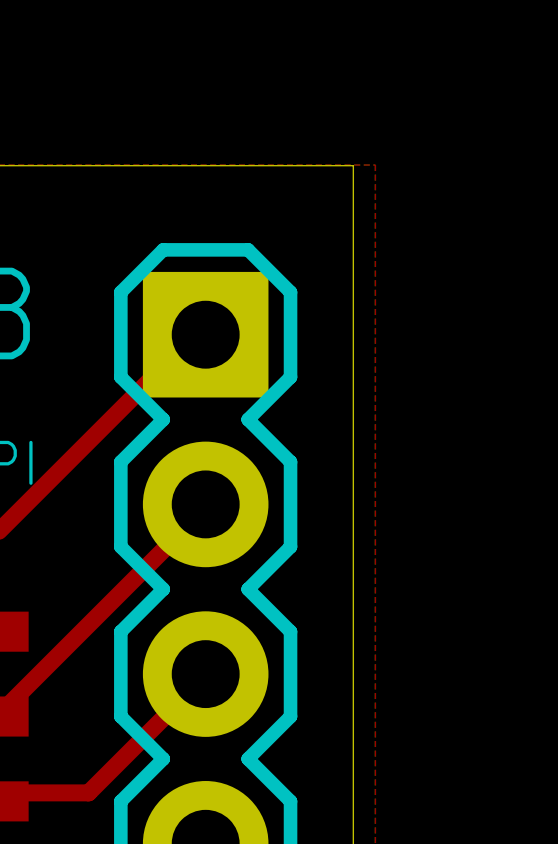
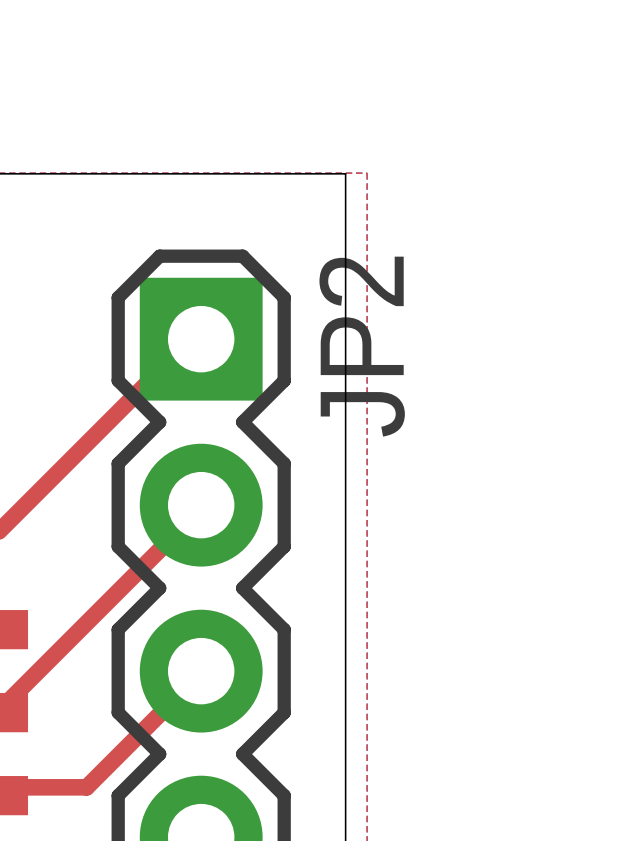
JP2 name: none -> JP2 (362, 346)

